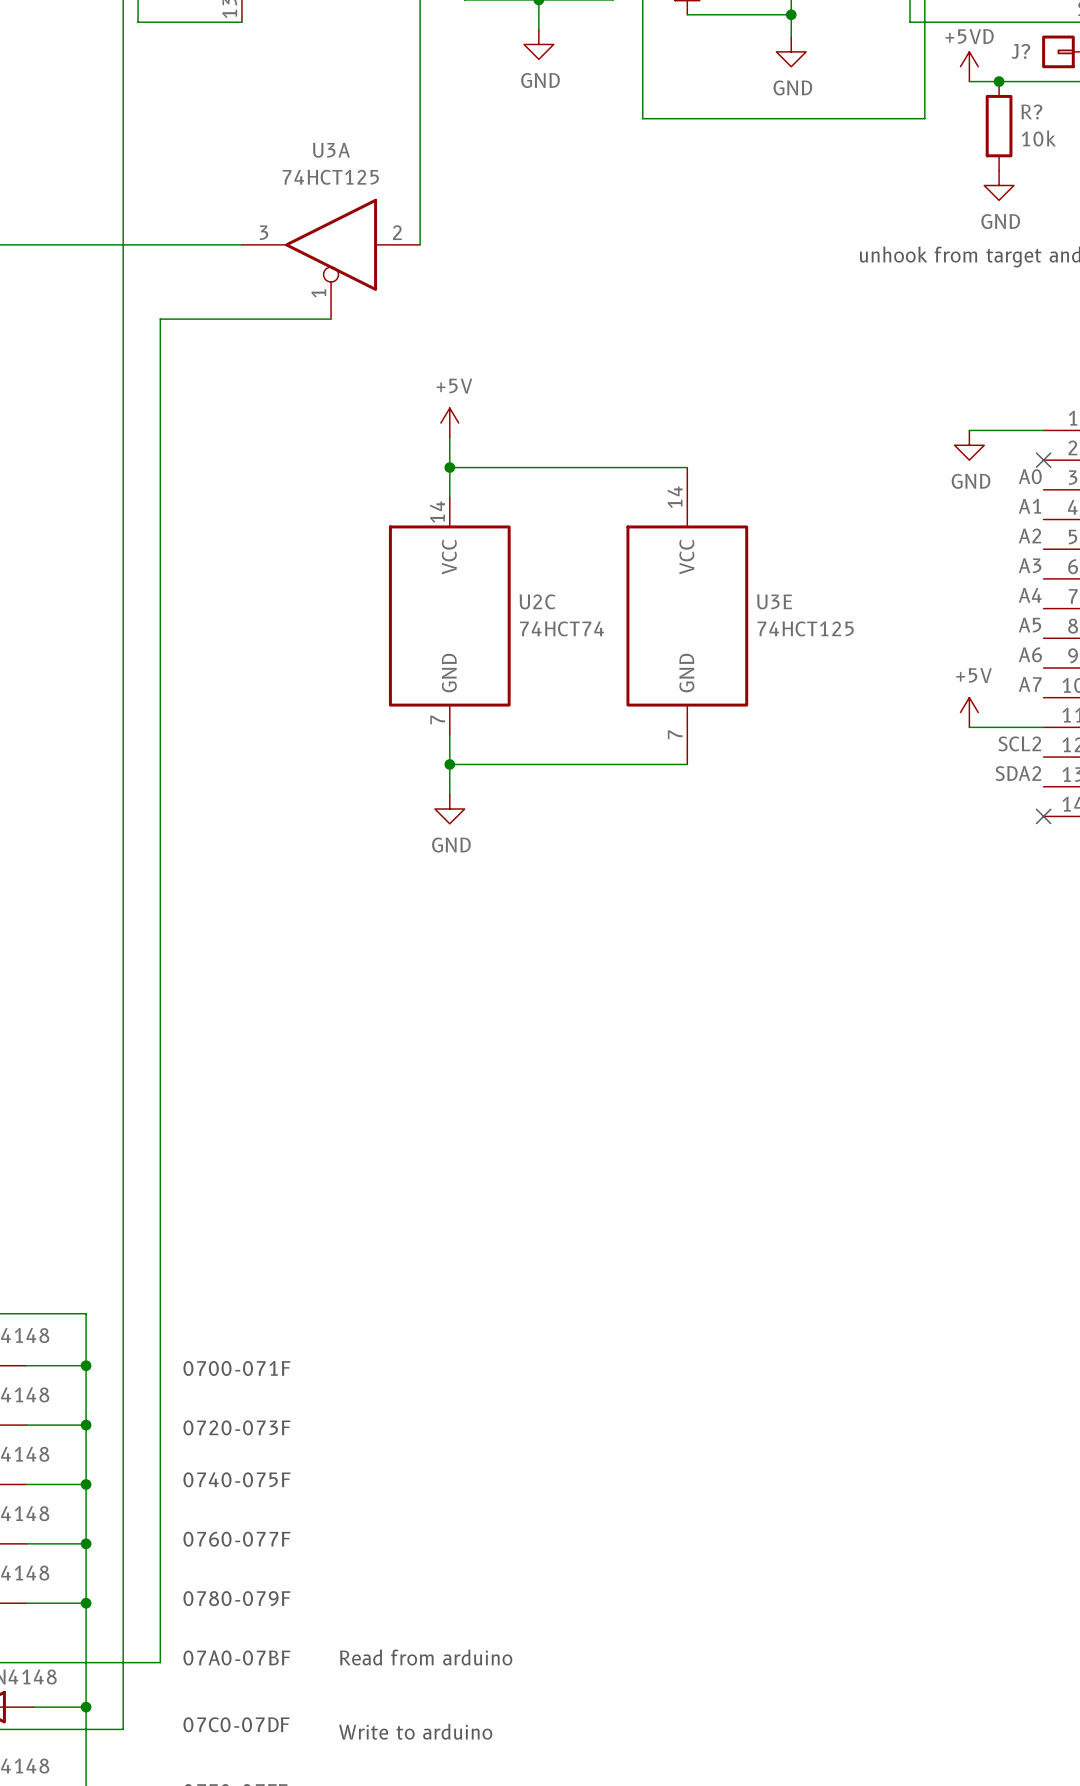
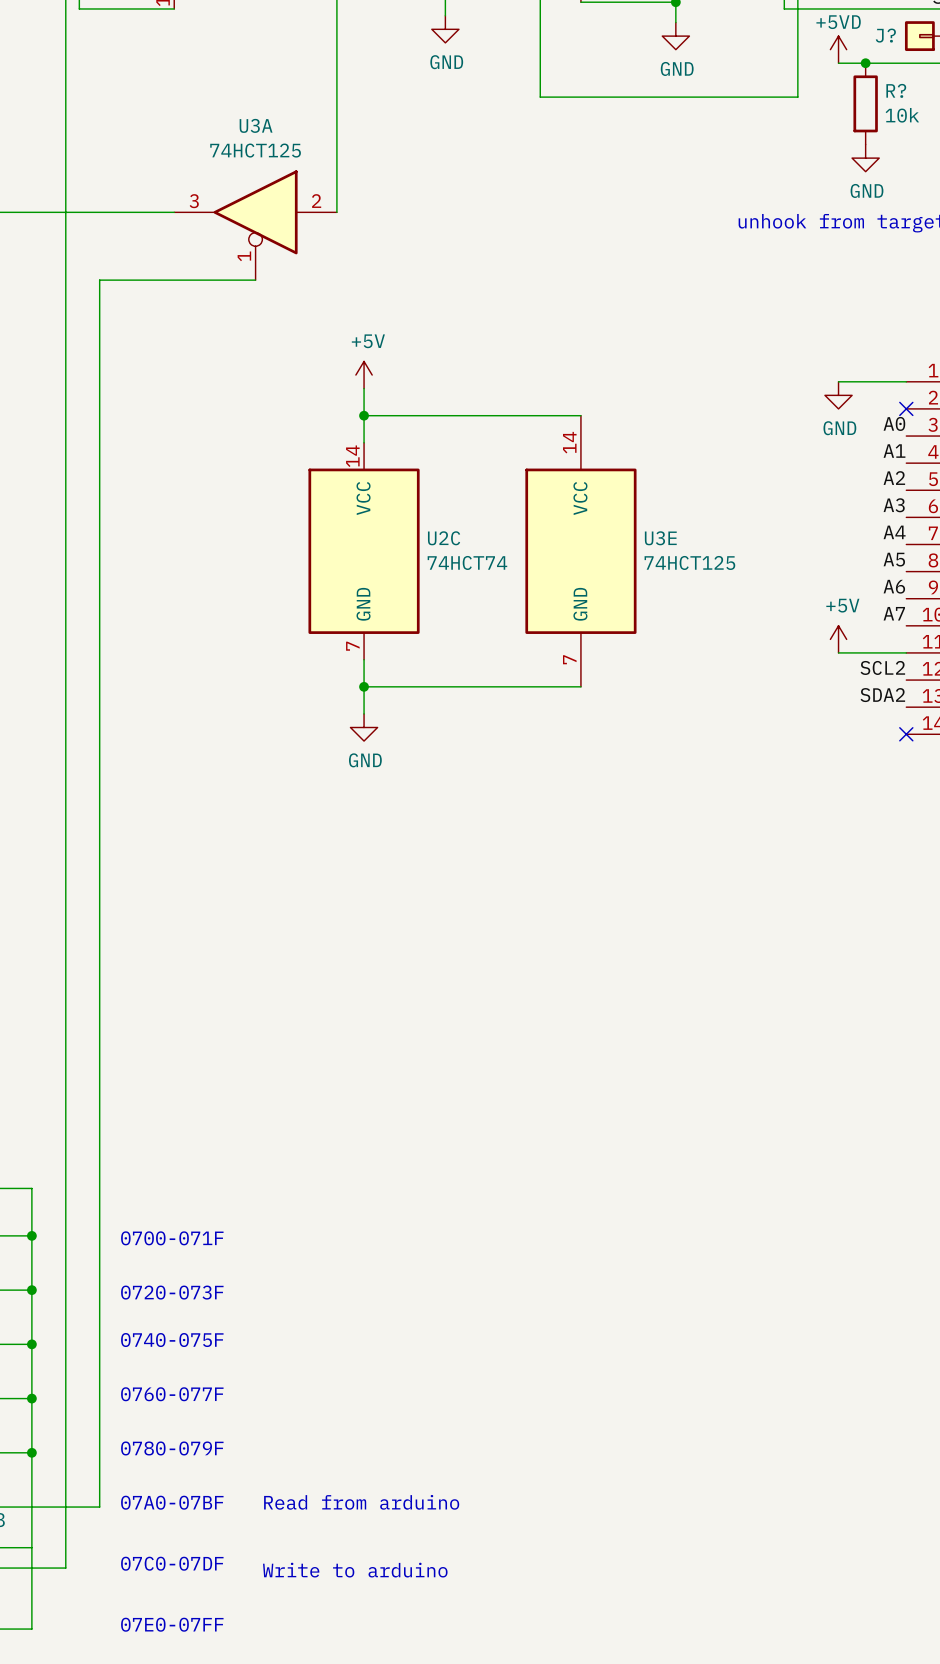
junction: (86, 1707) -> none

